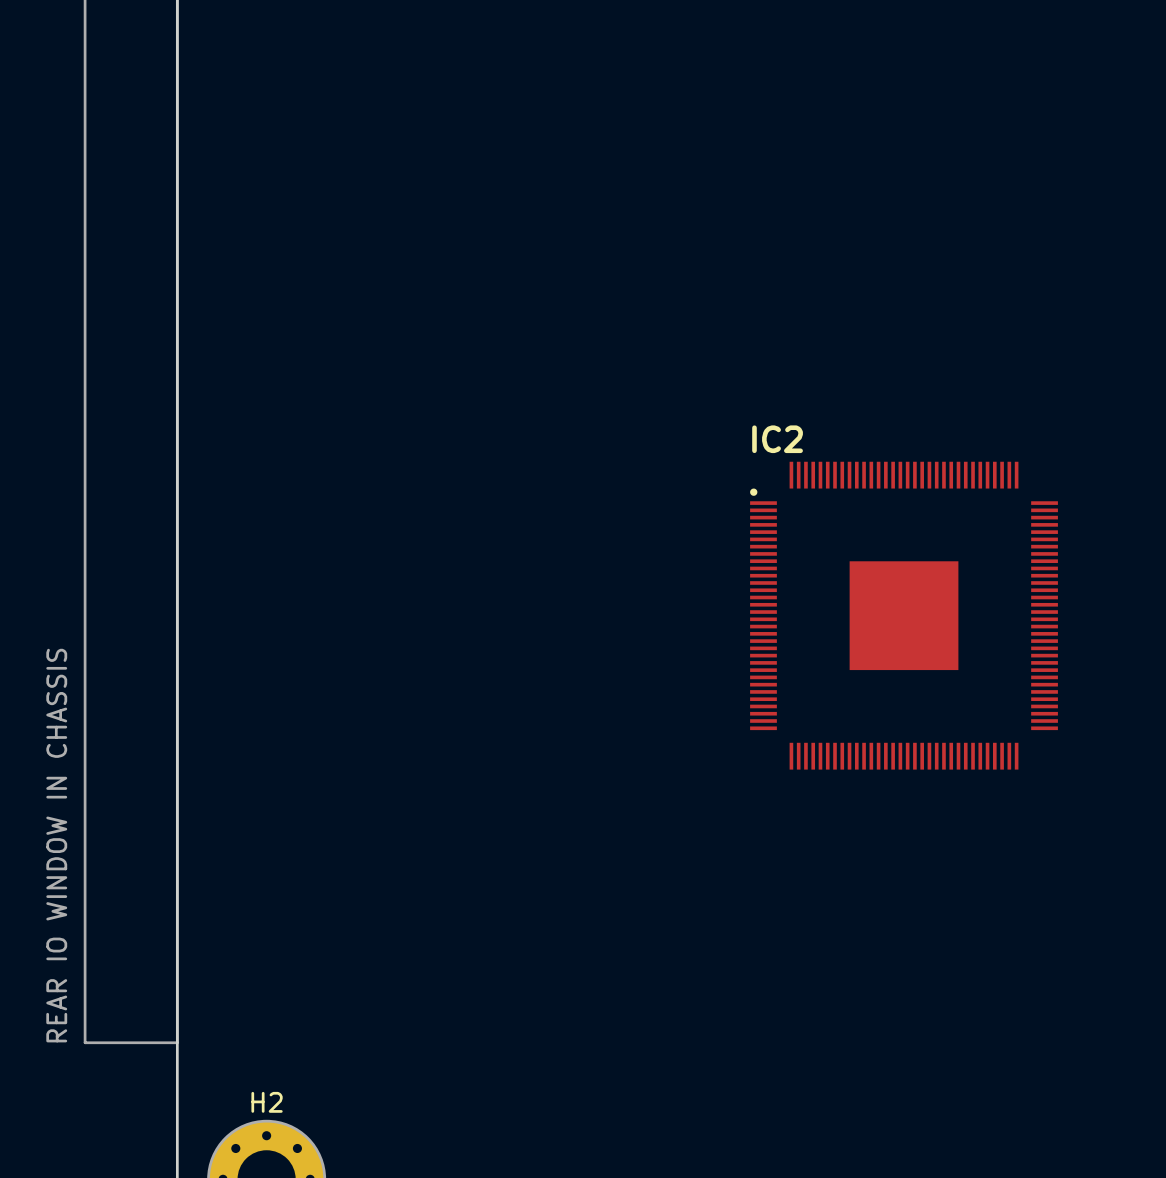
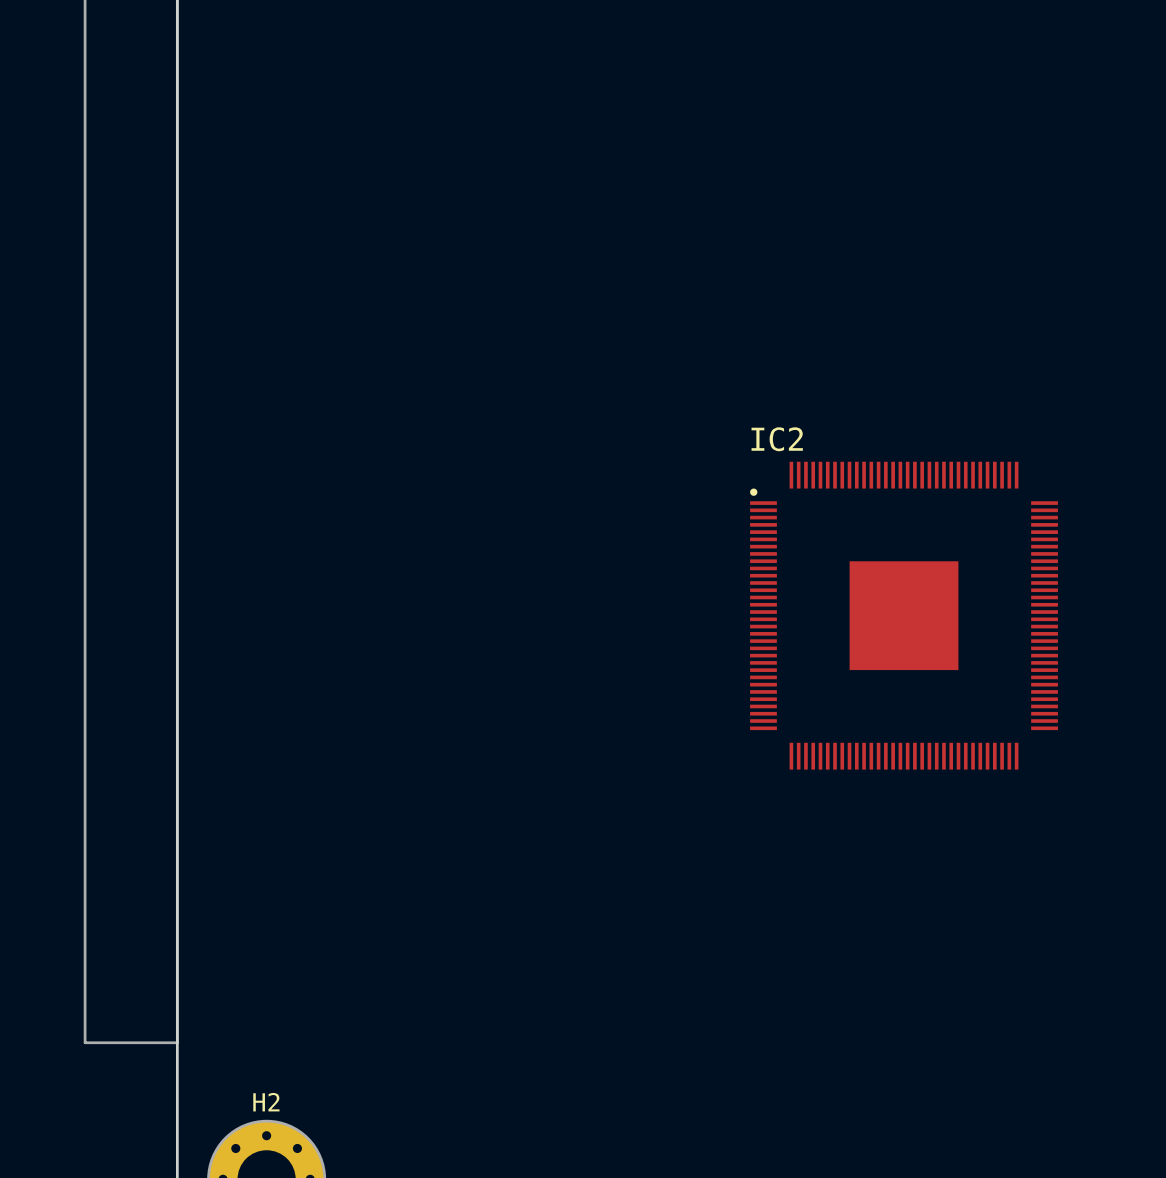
text: REAR IO WINDOW IN CHASSIS (56, 845) -> none

